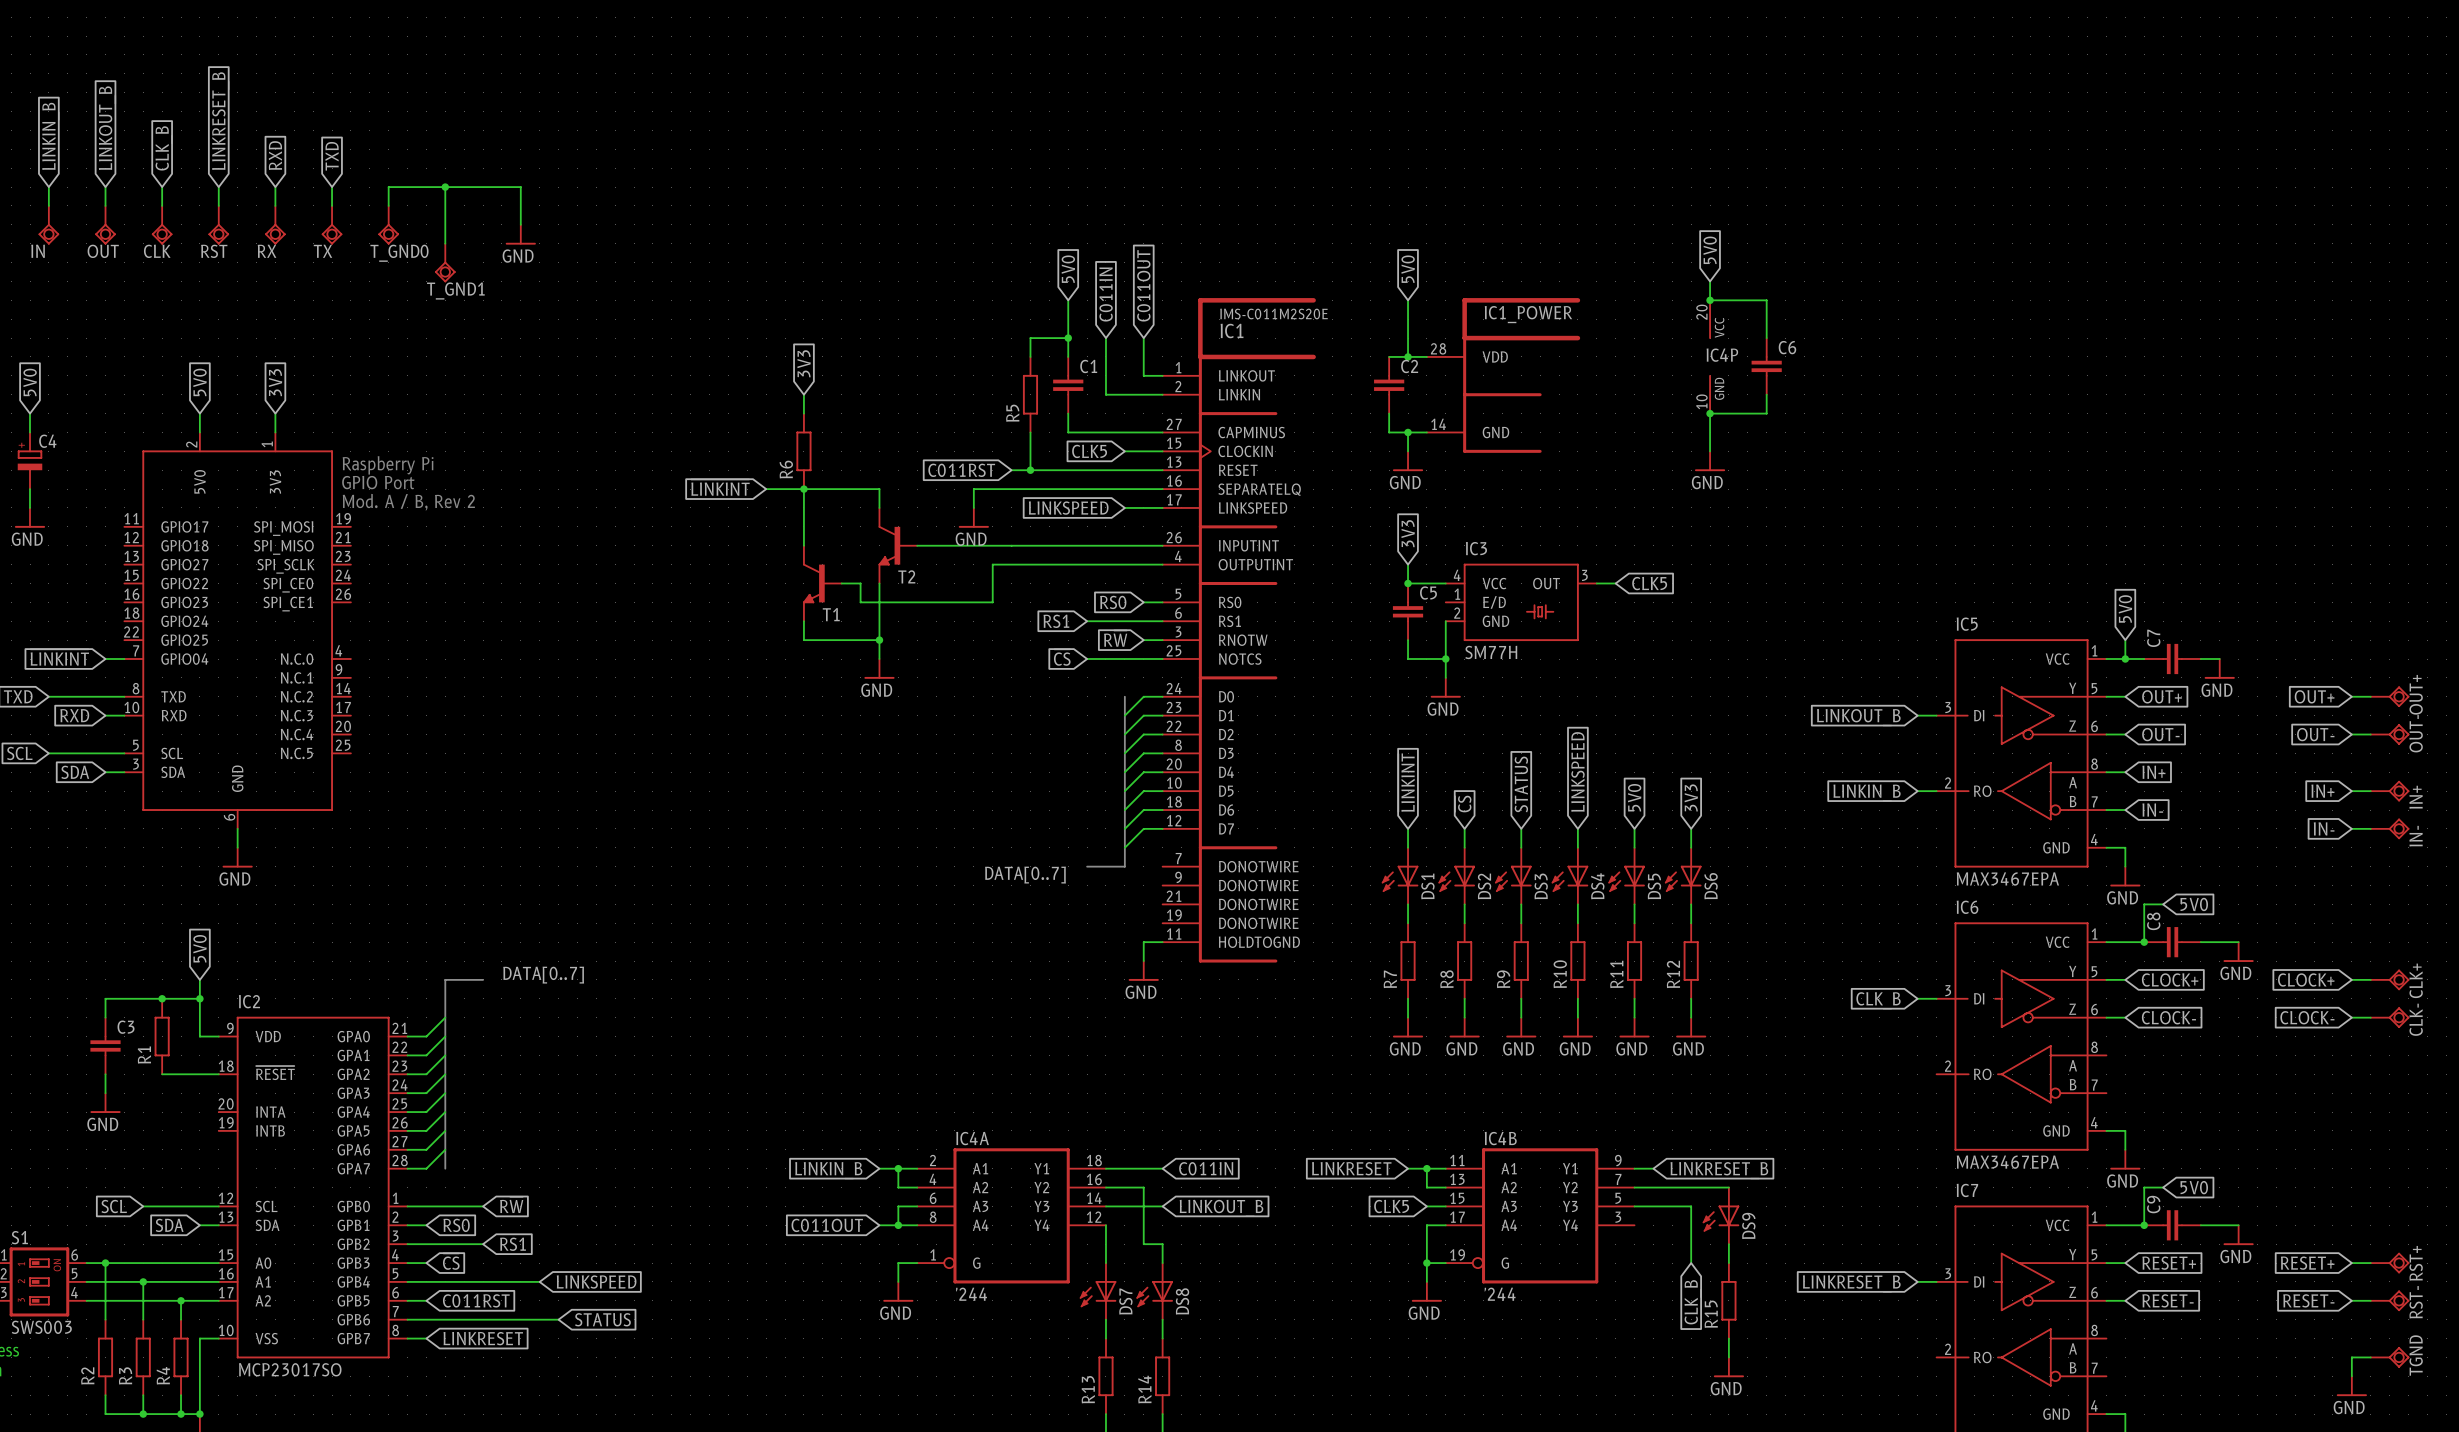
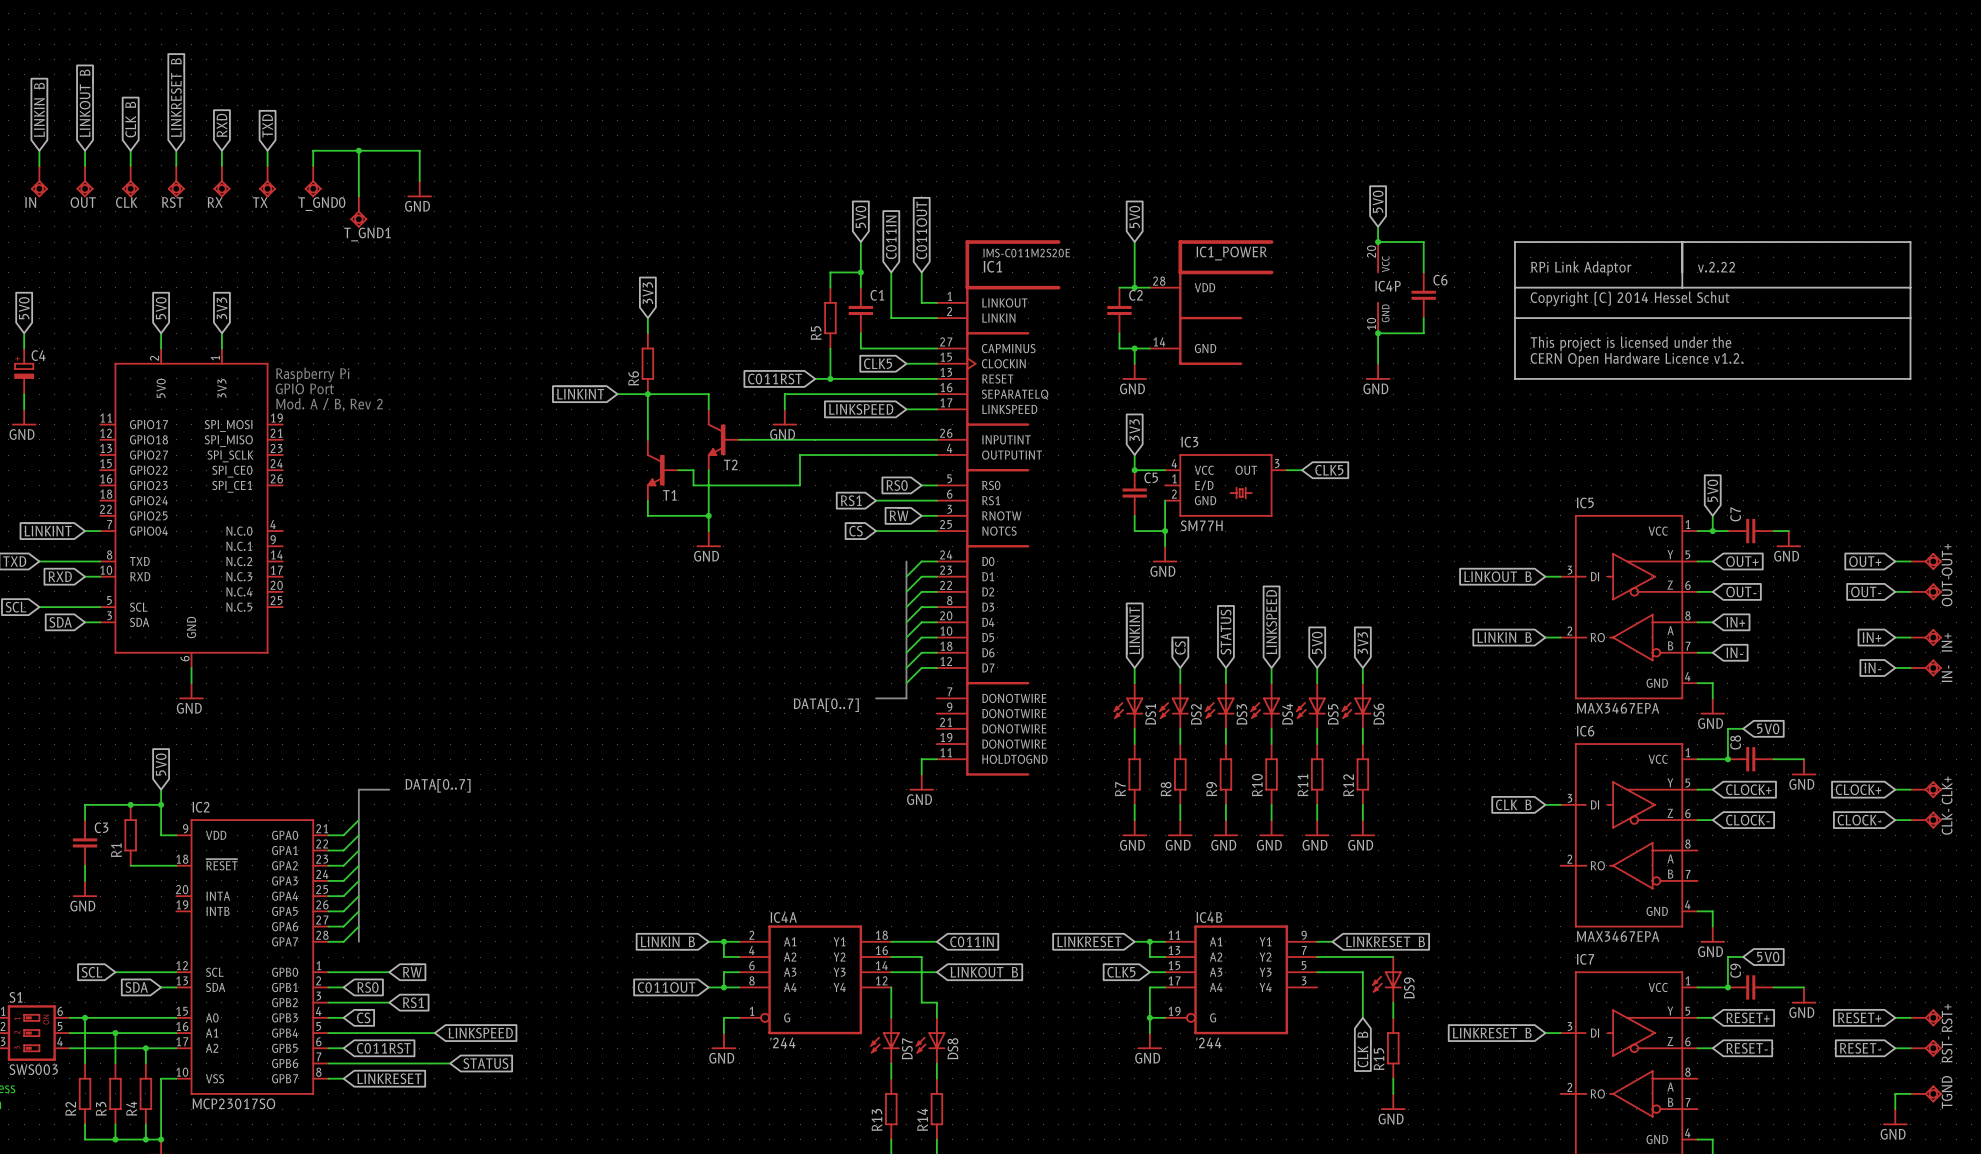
line: none -> (1514, 242) (1910, 242) (1910, 378) (1514, 378) (1514, 242)
line: none -> (1682, 242) (1682, 287)
text: none -> v.2.22 (1716, 267)
text: none -> RPi Link Adaptor (1581, 268)
line: none -> (1514, 287) (1910, 287)
text: none -> Copyright (C) 2014 Hessel Schut (1630, 299)
line: none -> (1514, 318) (1910, 318)
text: none -> This project is licensed under the (1630, 343)
text: none -> CERN Open Hardware Licence v1.2. (1637, 359)

